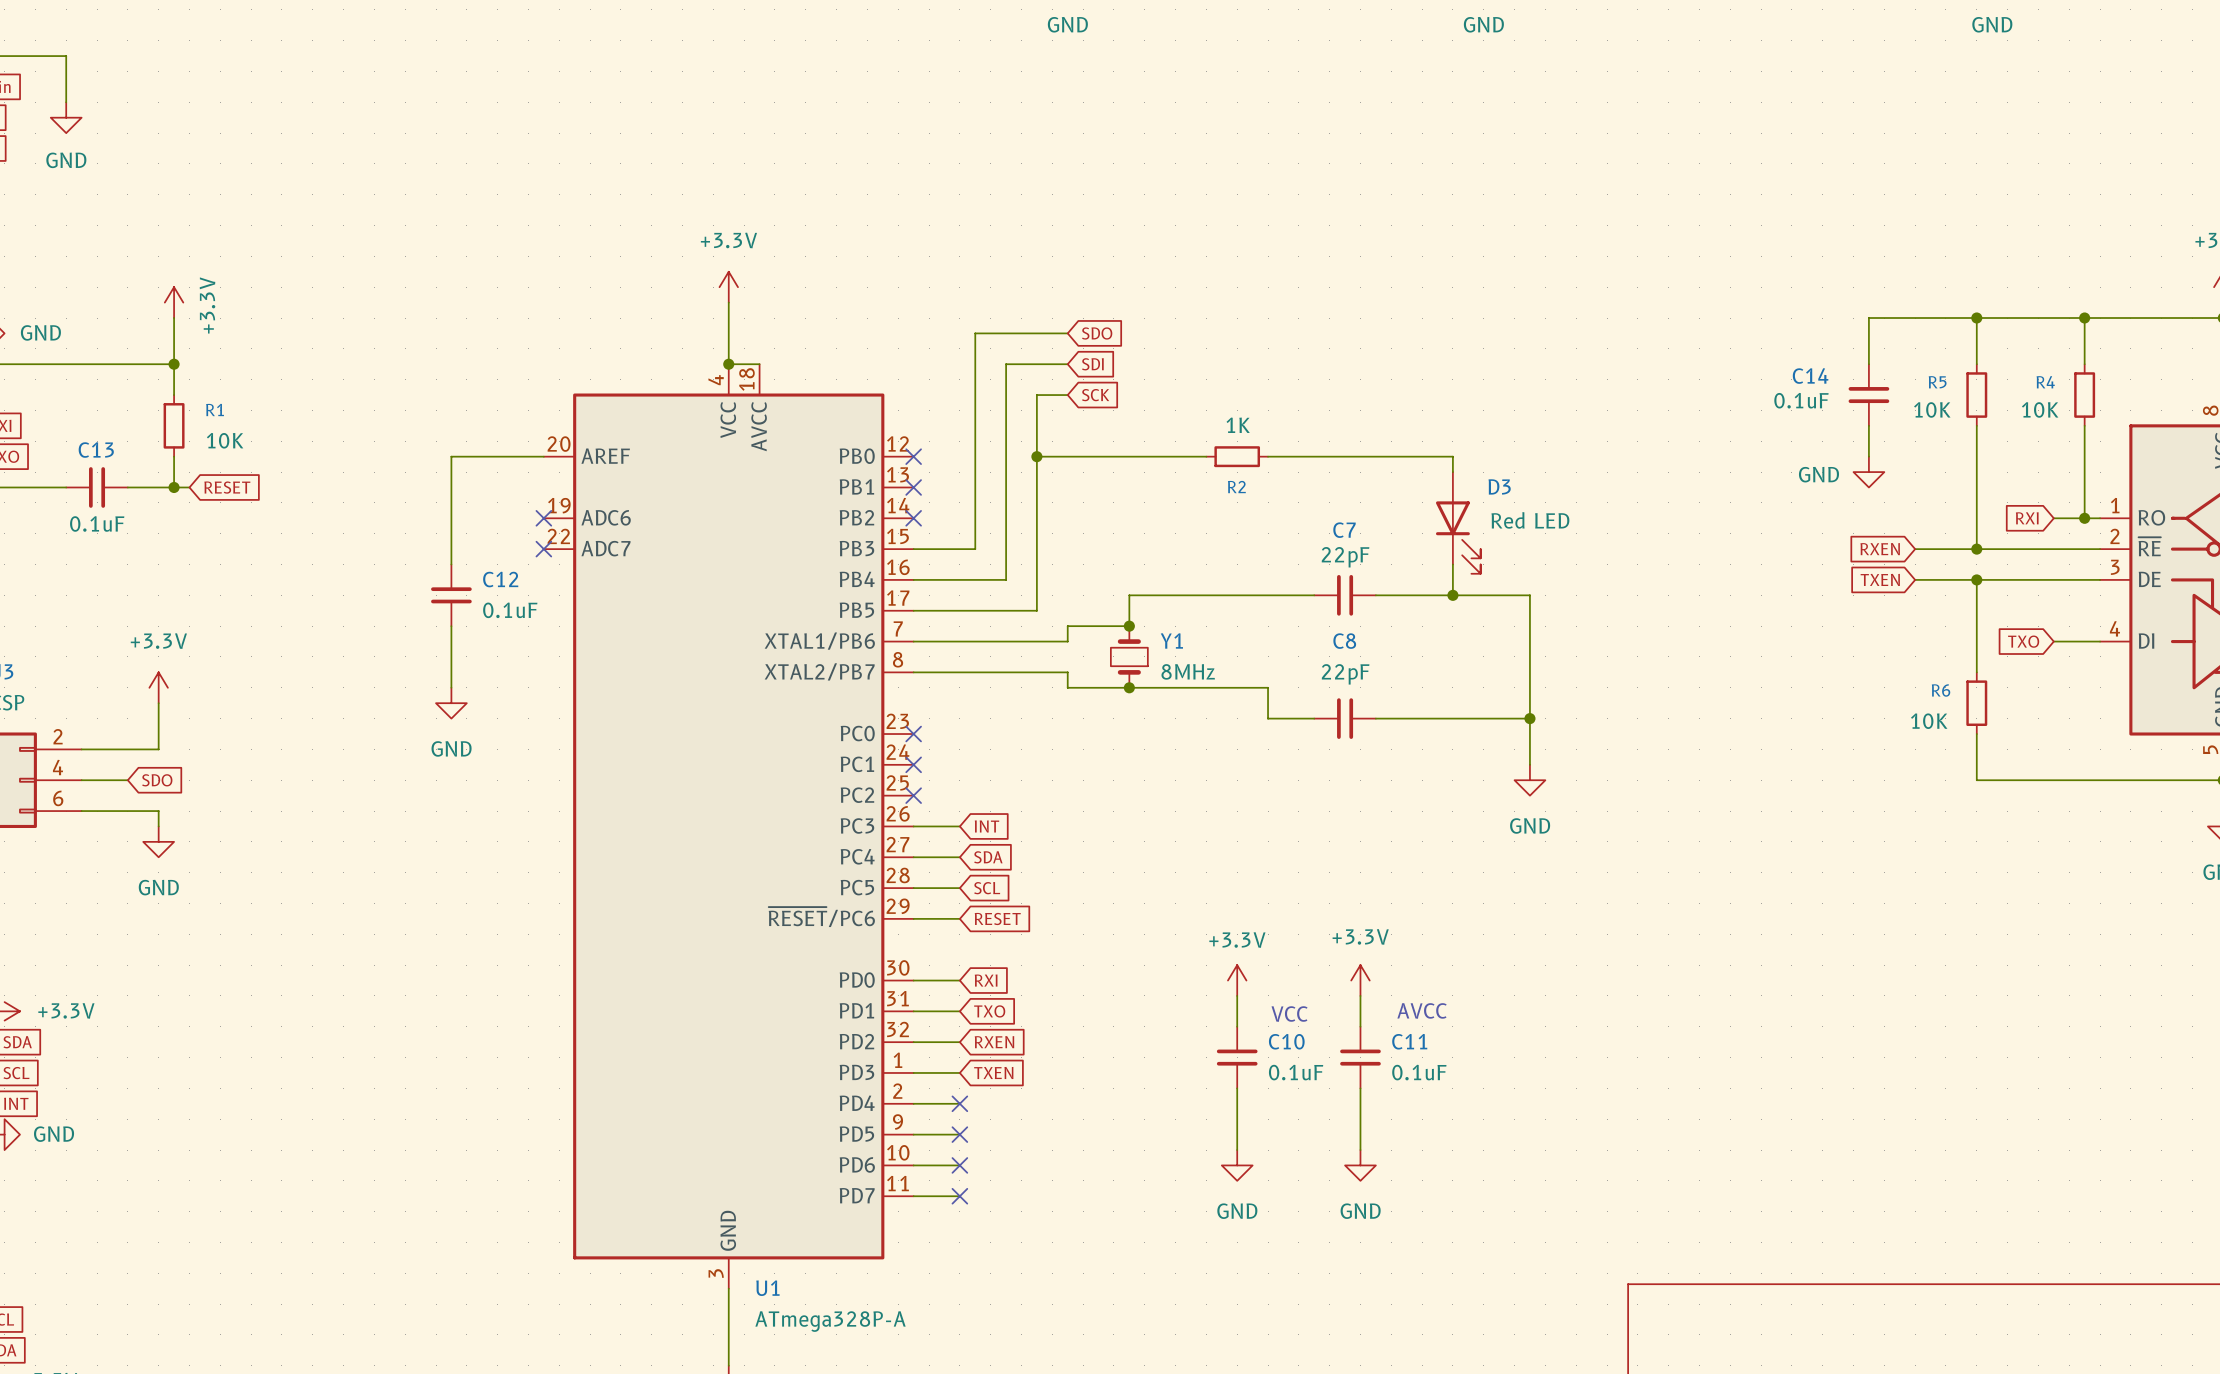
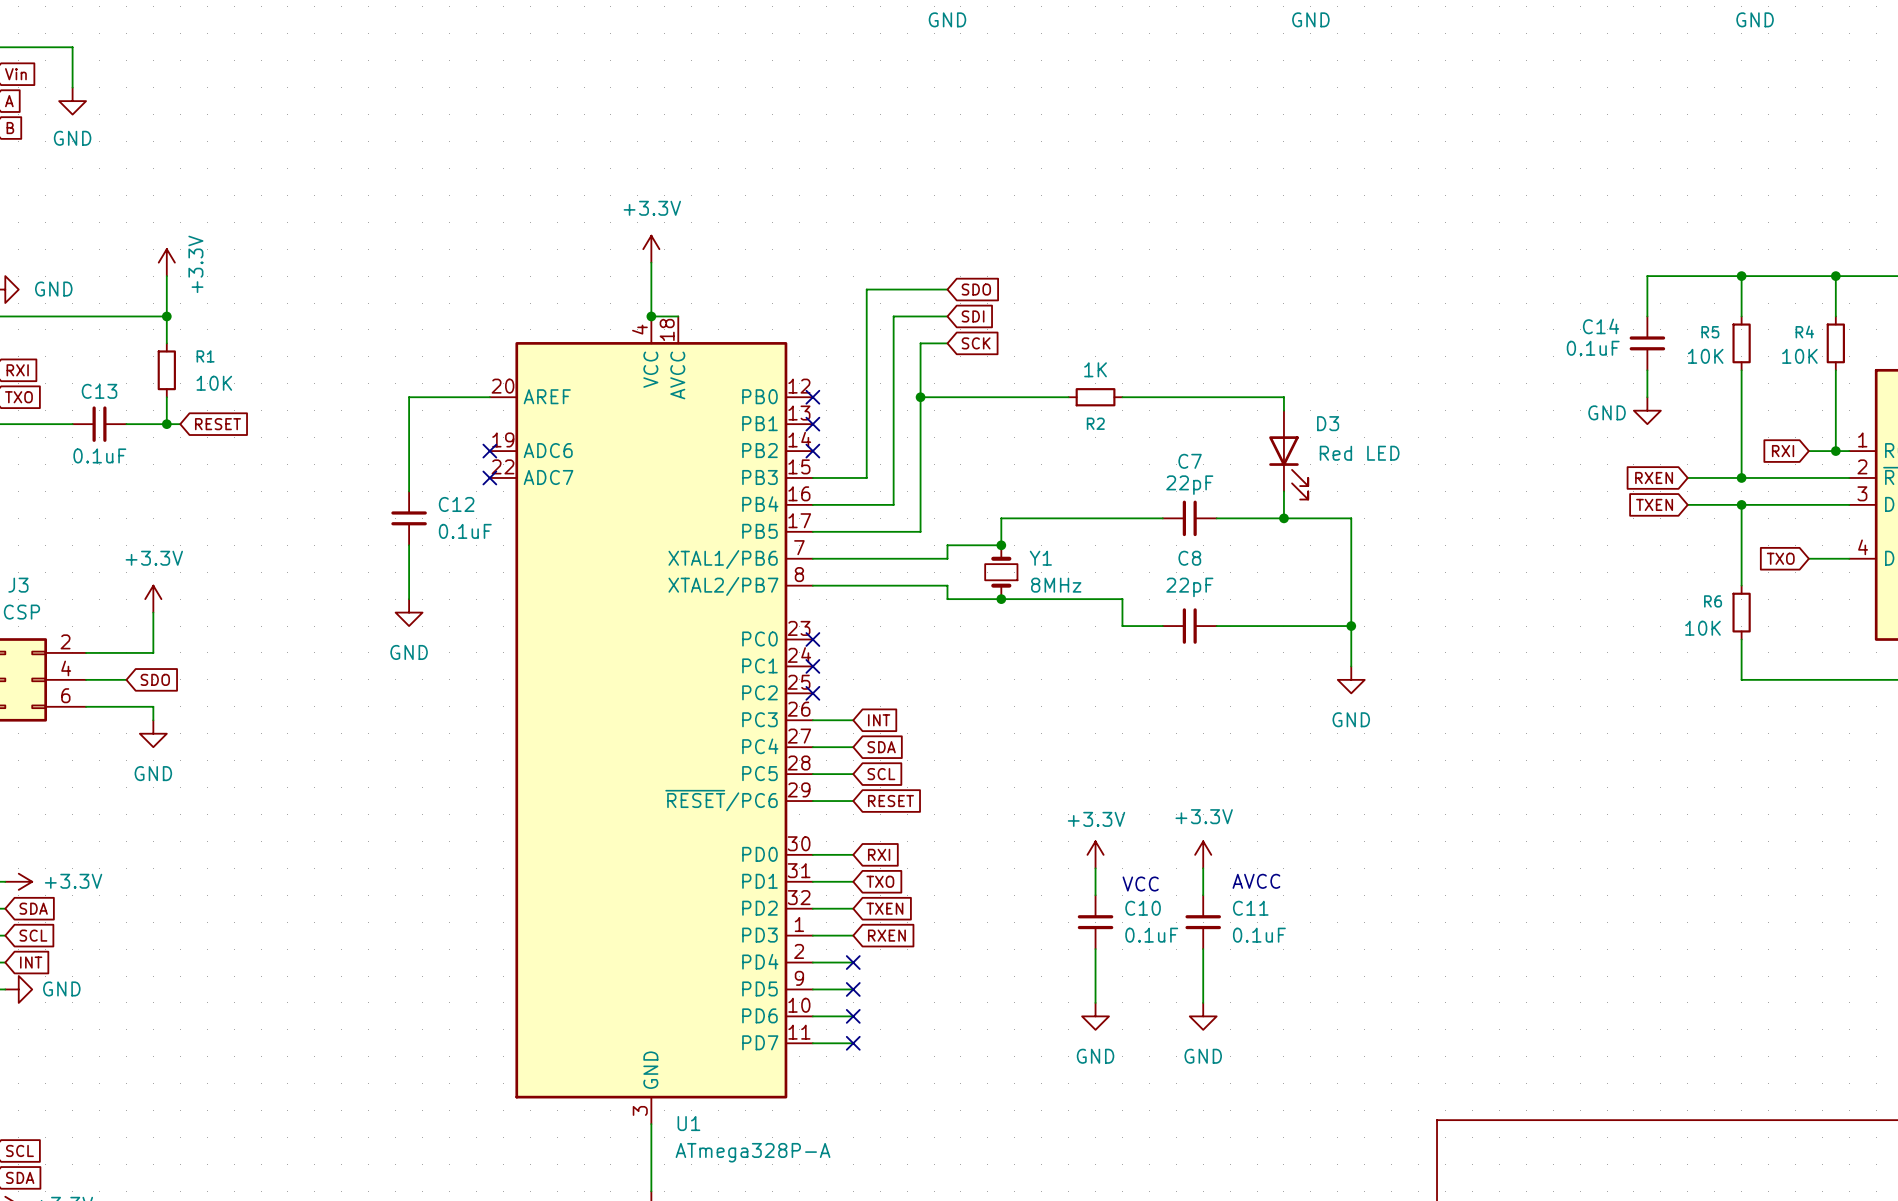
global label: RXEN (994, 1042) -> TXEN (884, 908)
global label: TXEN (993, 1072) -> RXEN (886, 935)

